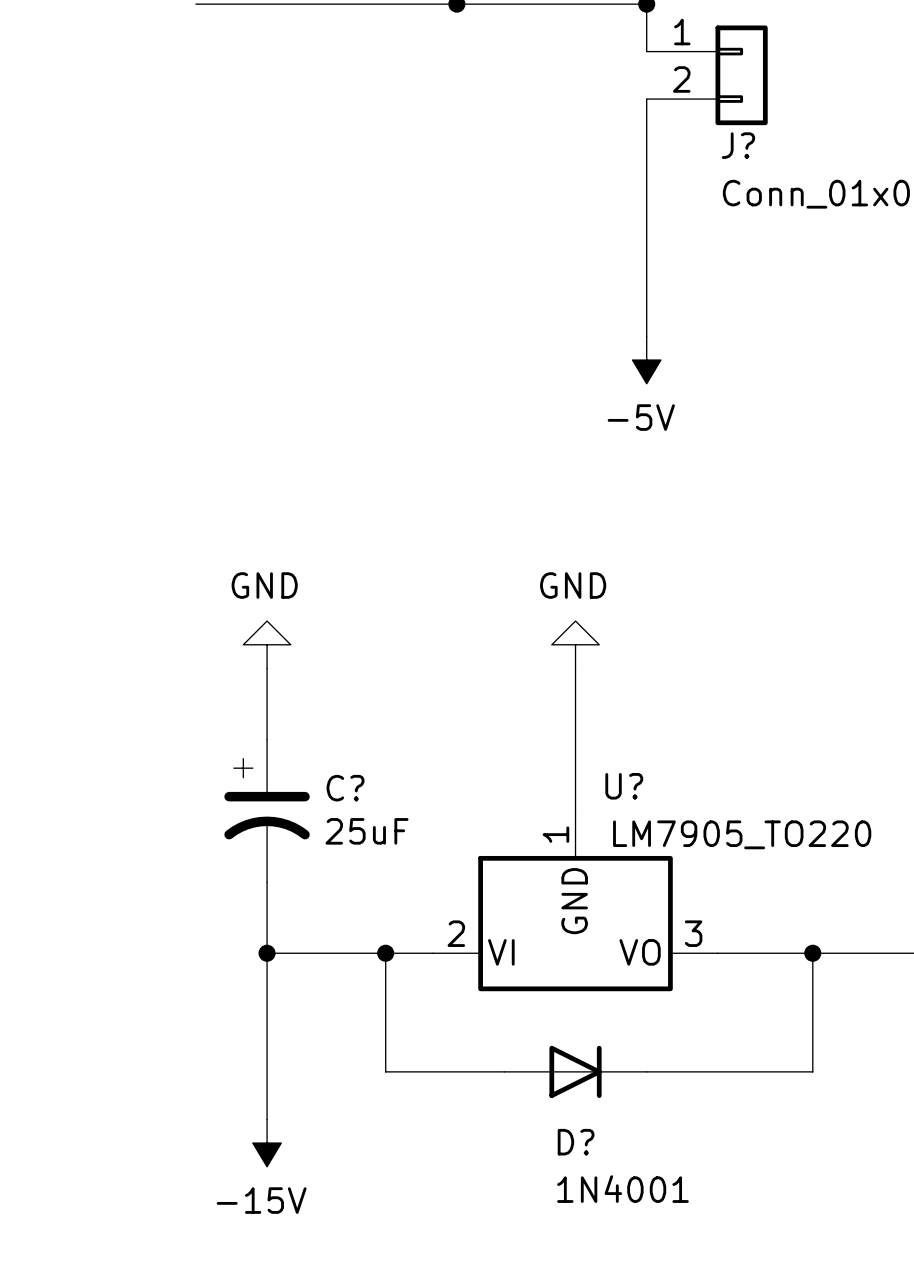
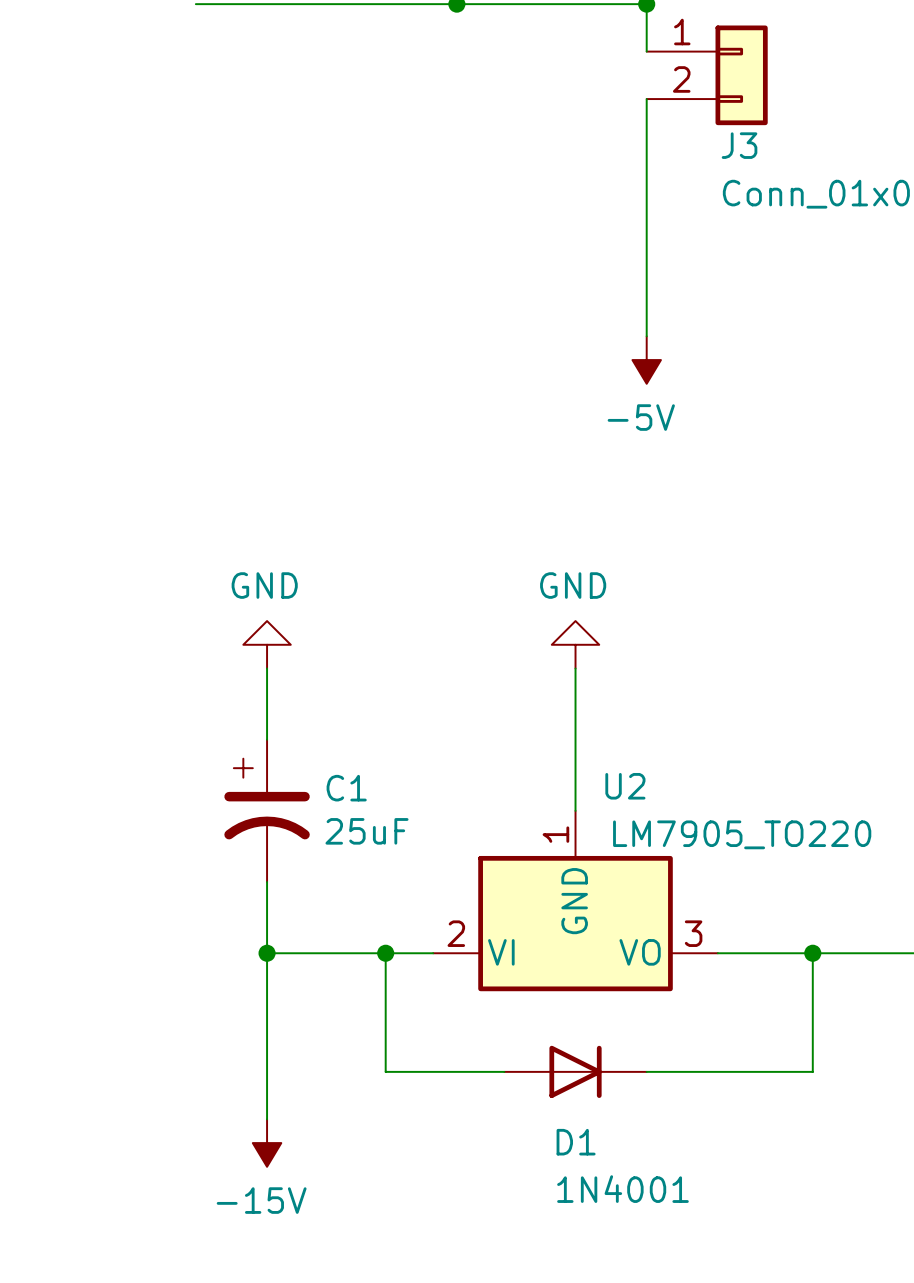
J? name: J? (738, 145) -> J3 (739, 145)
U? name: U? (624, 786) -> U2 (625, 786)
C? name: C? (345, 788) -> C1 (346, 788)
D? name: D? (576, 1142) -> D1 (576, 1142)

